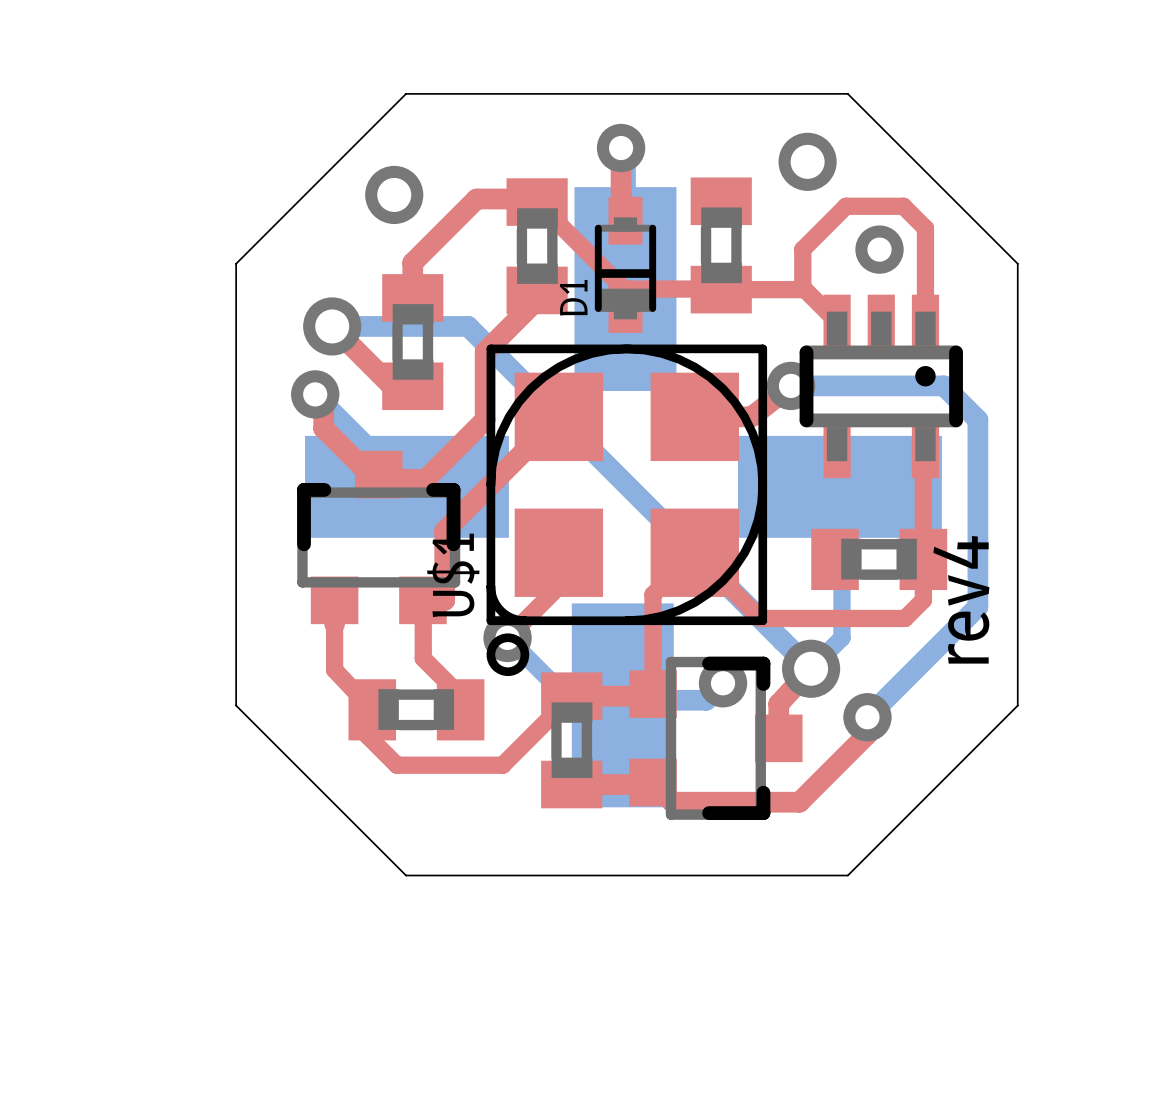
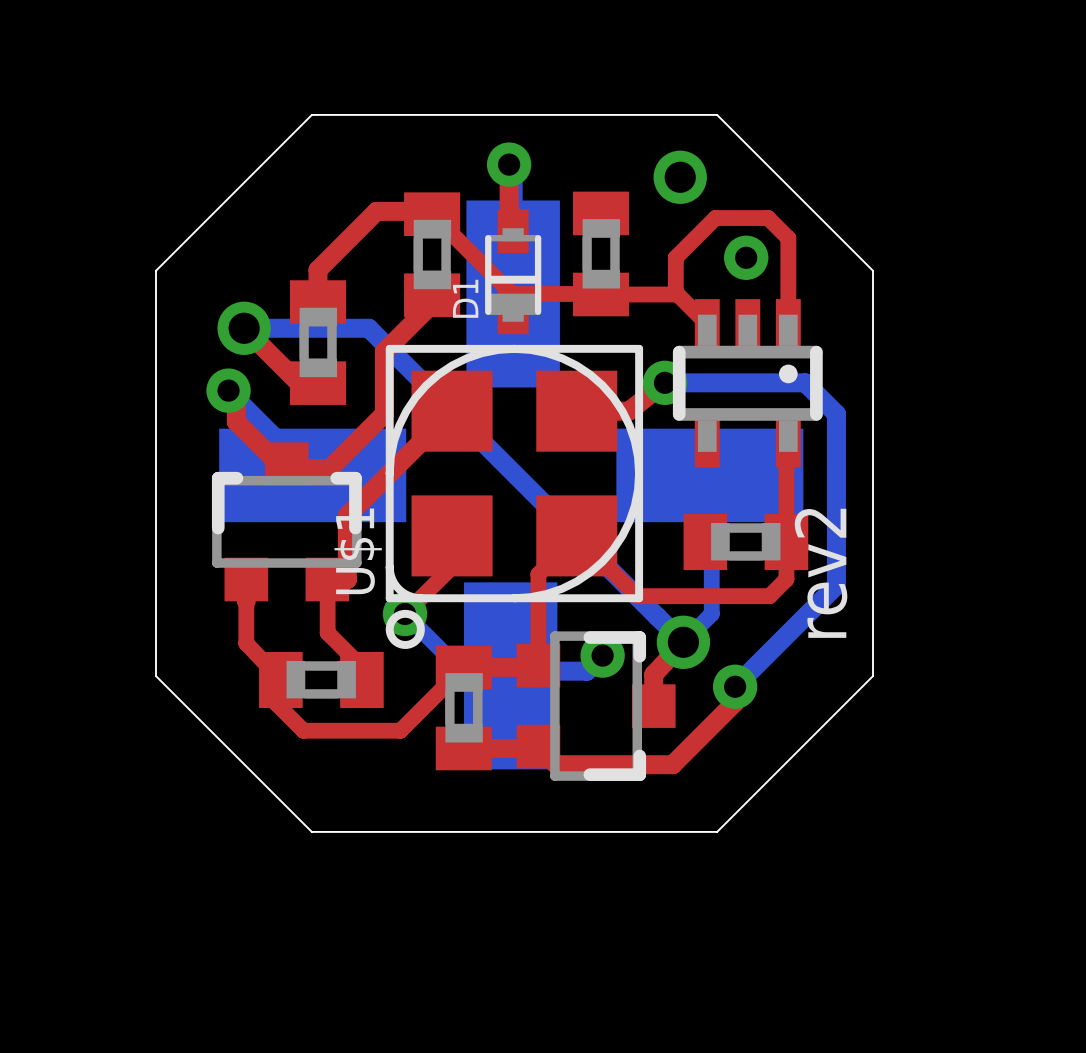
via: (394, 194) -> none
text: rev4 (961, 599) -> rev2 (821, 573)

